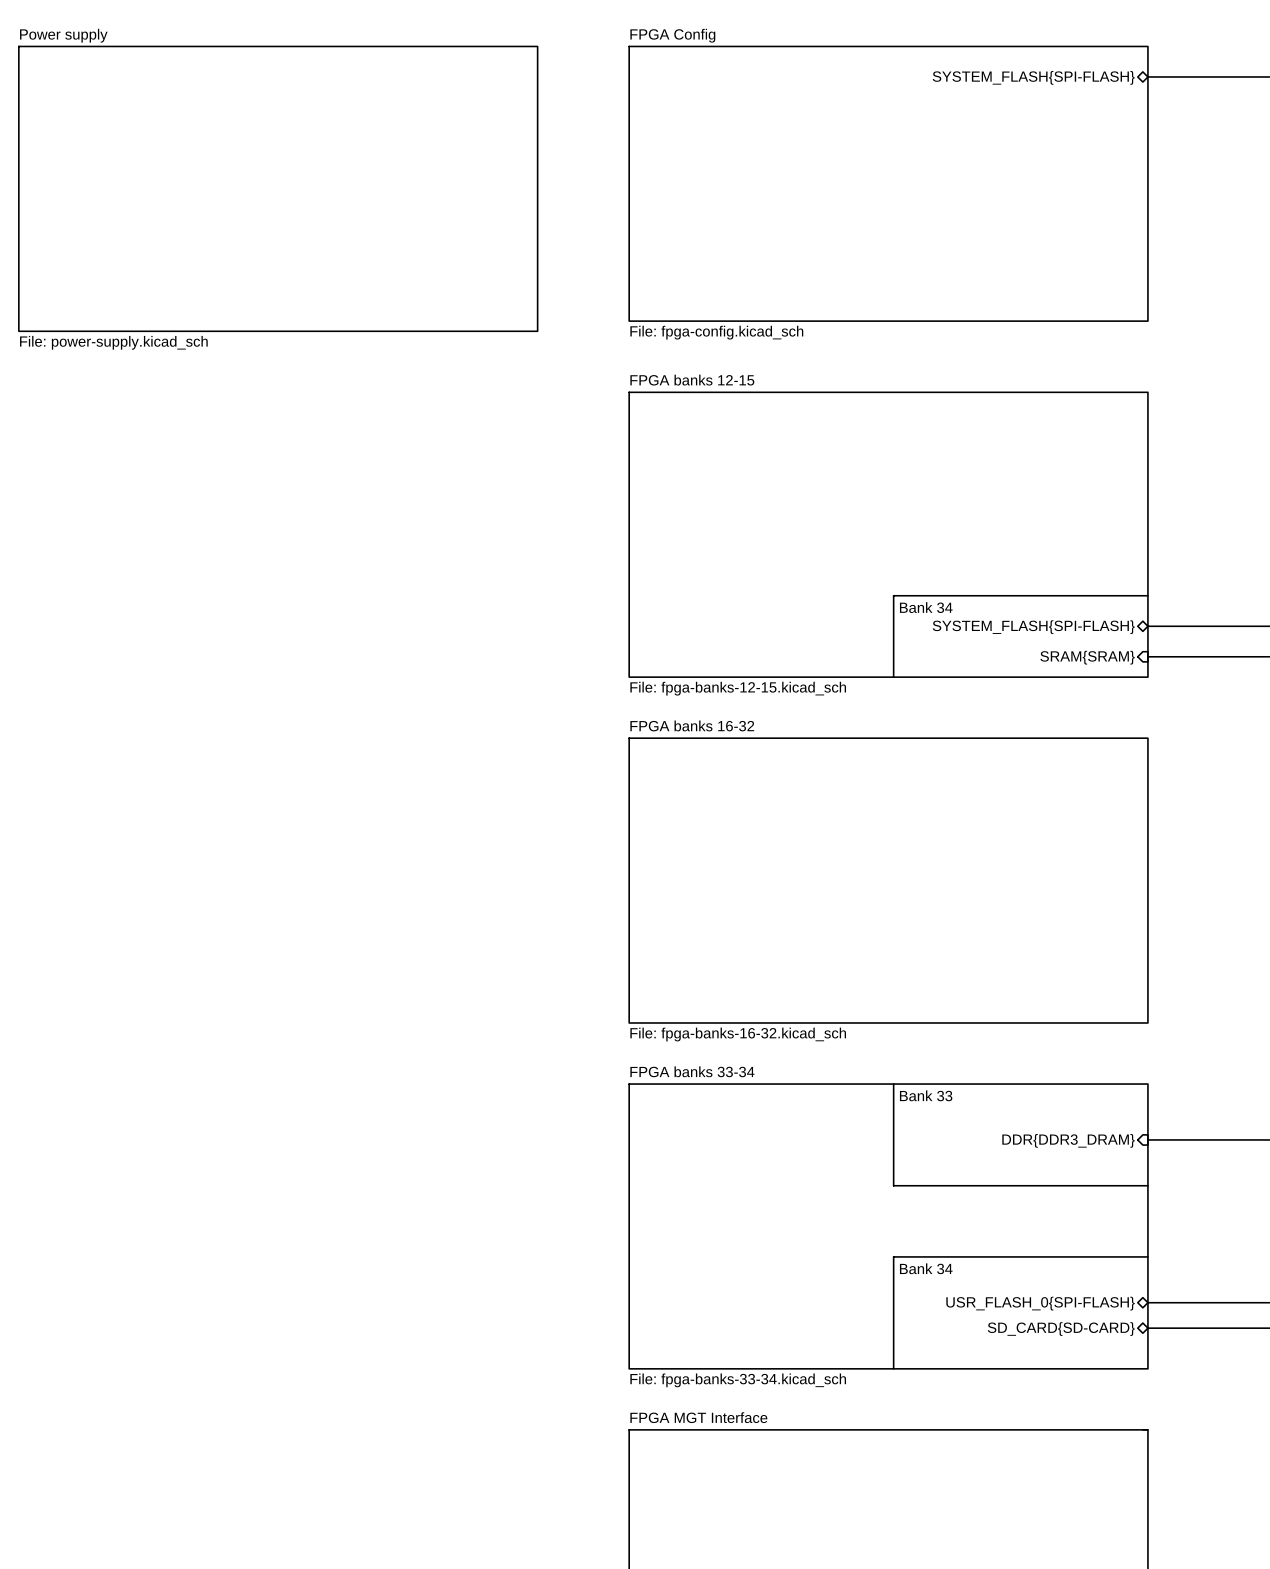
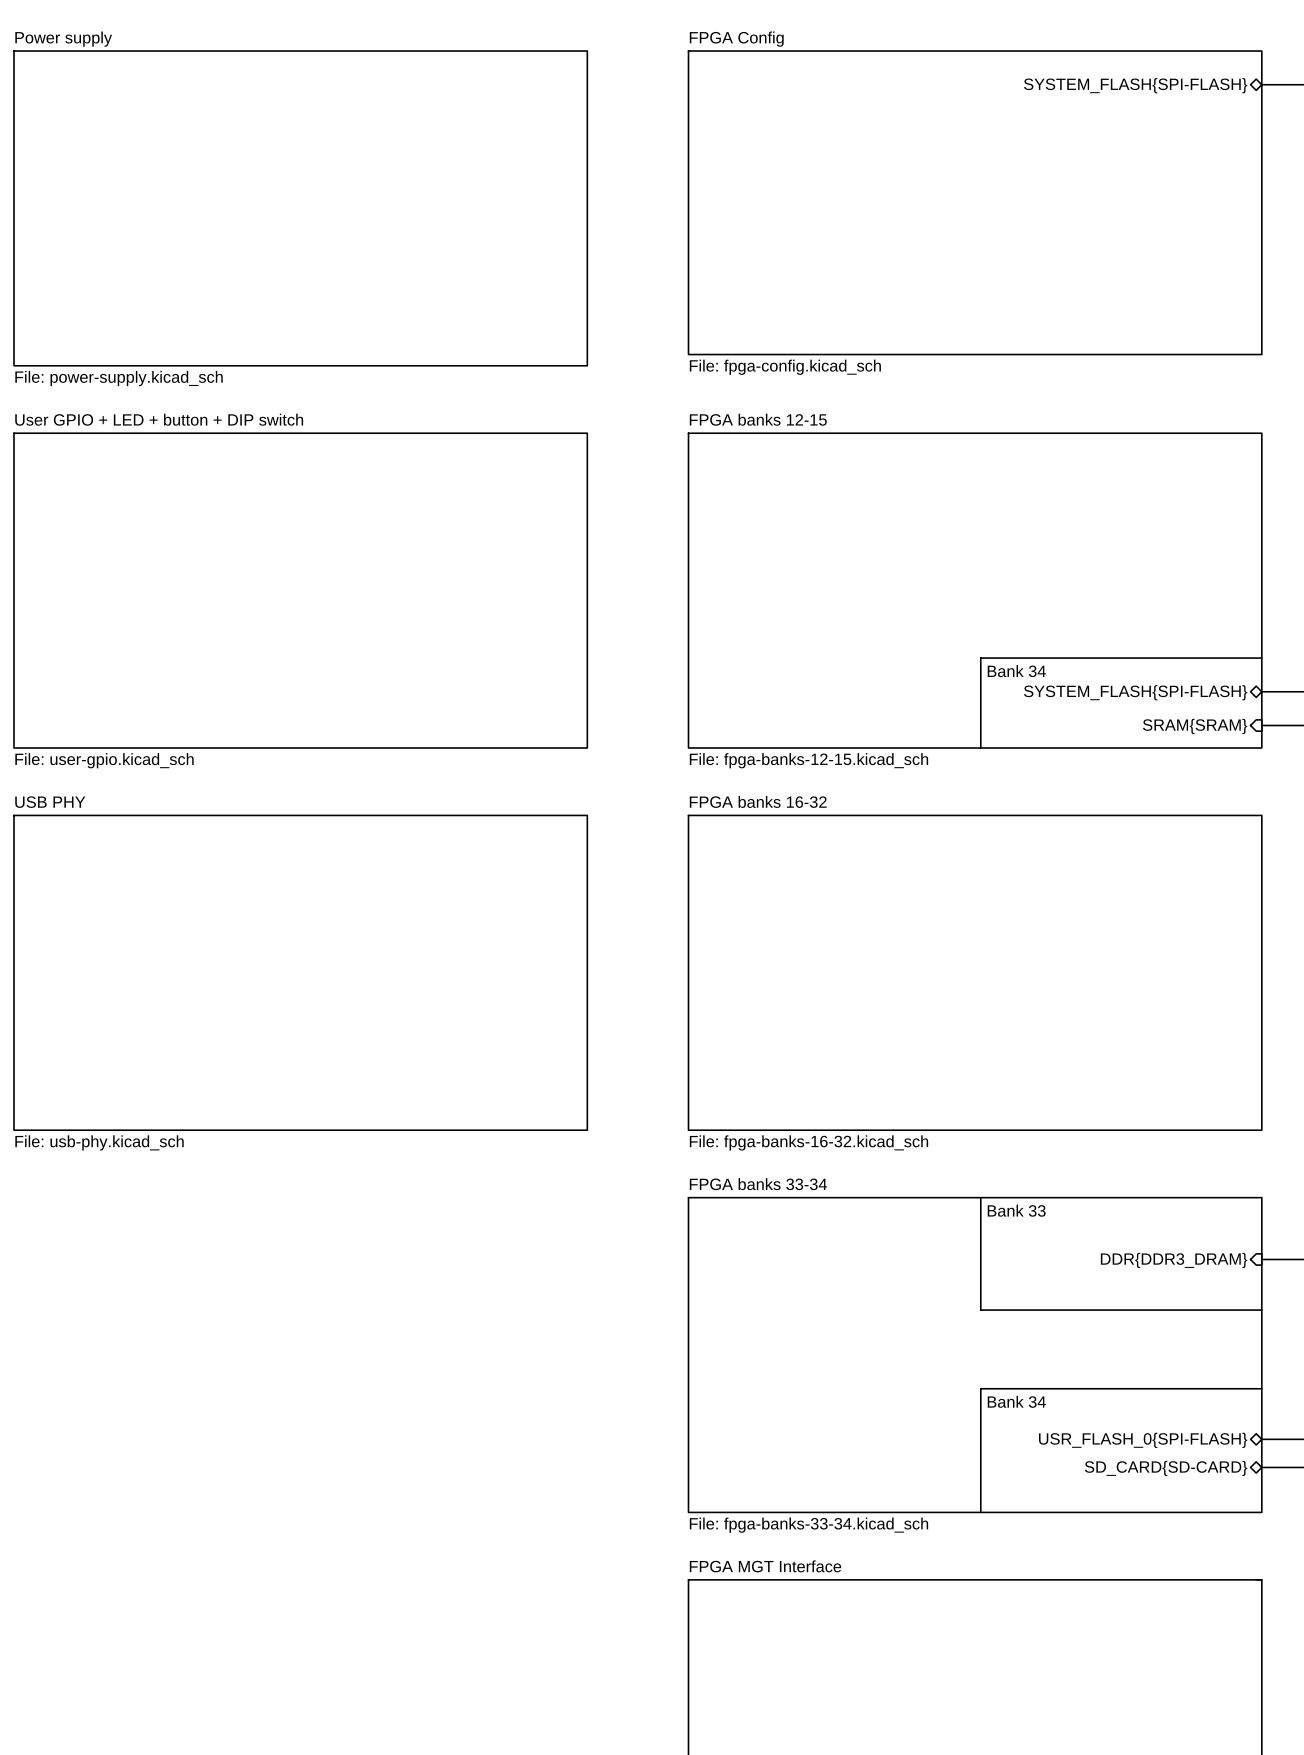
sheet User GPIO + LED + button + DIP switch: none -> File: user-gpio.kicad_sch (300, 590)
sheet USB PHY: none -> File: usb-phy.kicad_sch (300, 972)

